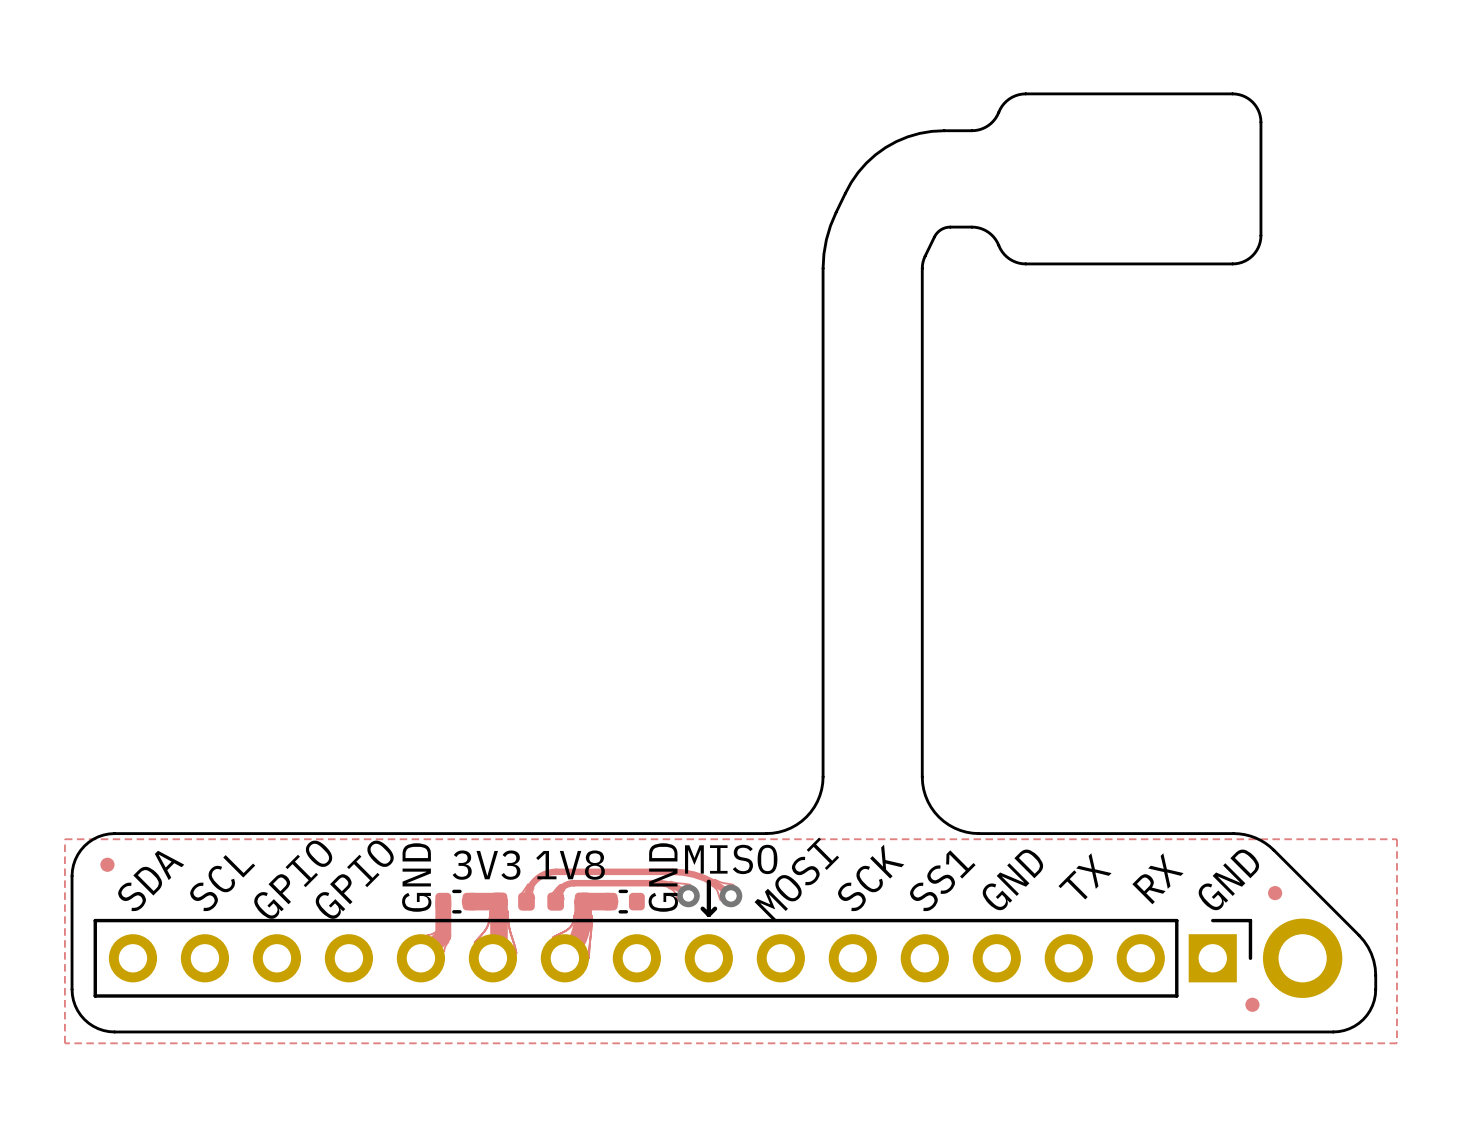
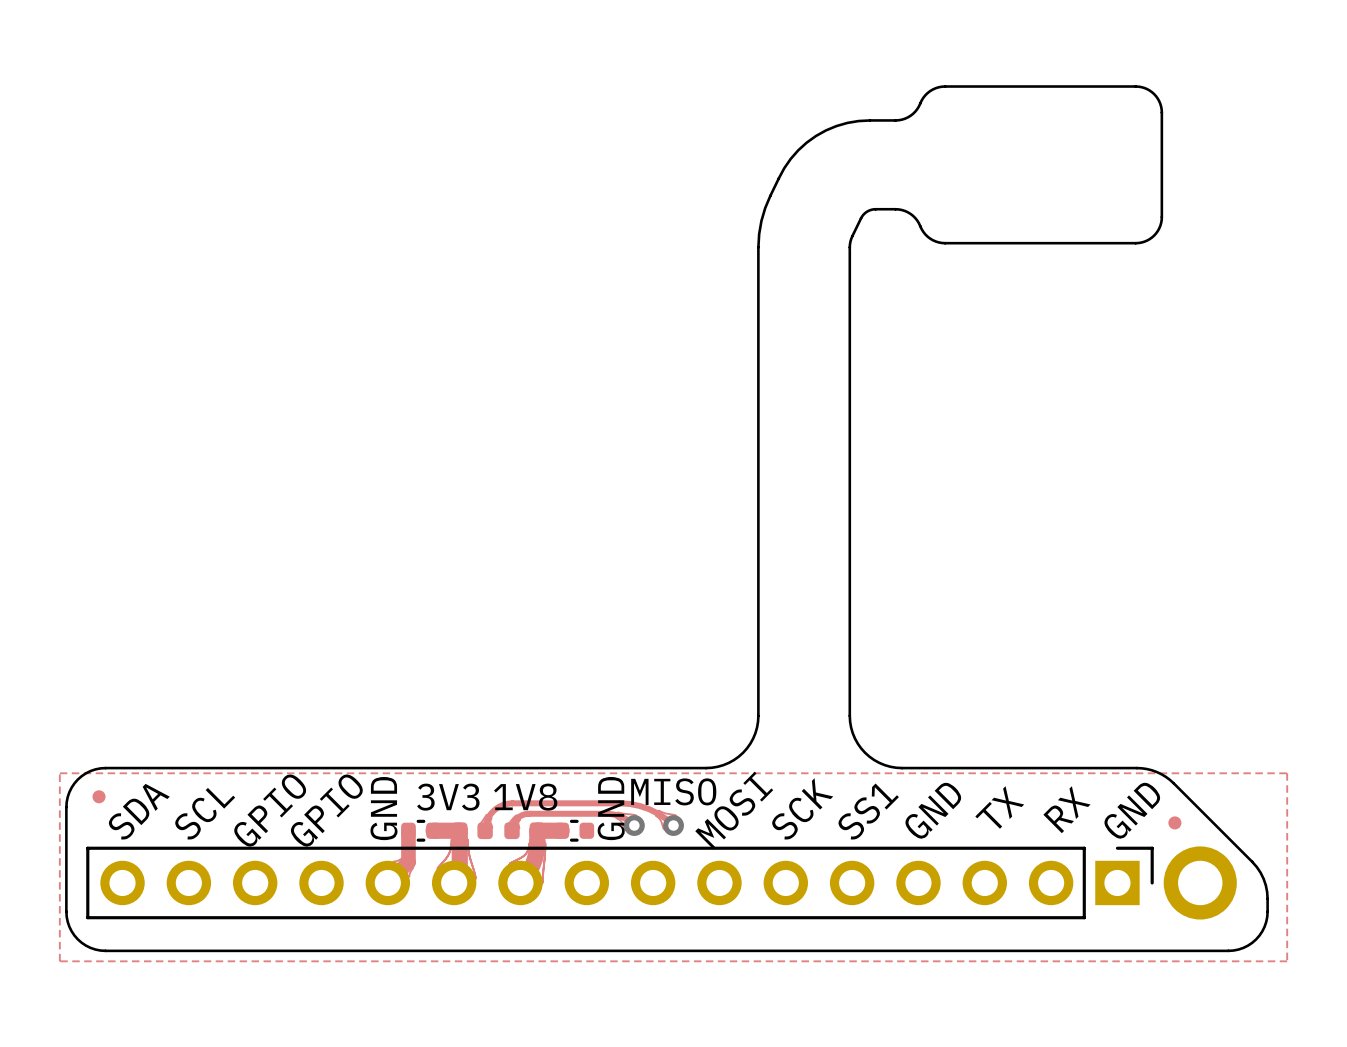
line: (708, 881) (708, 914) -> none
line: (702, 908) (708, 914) -> none
line: (715, 908) (708, 914) -> none
part: (1252, 1004) -> none

